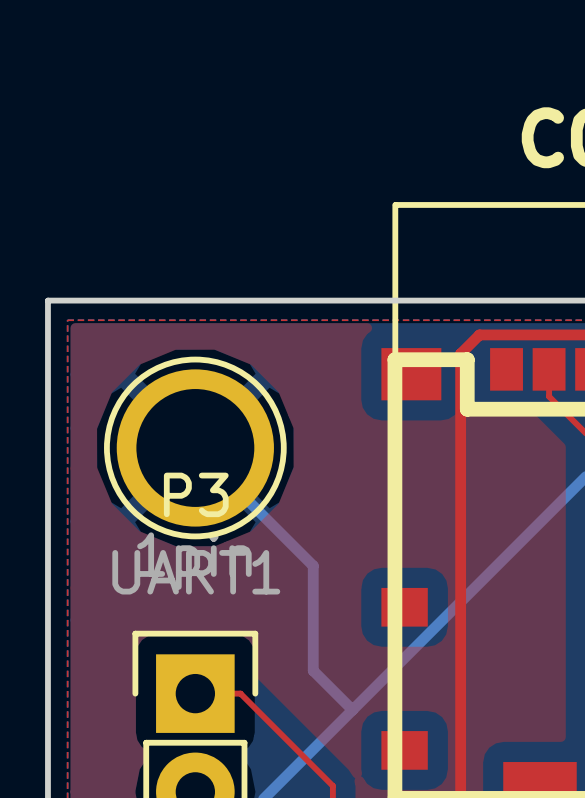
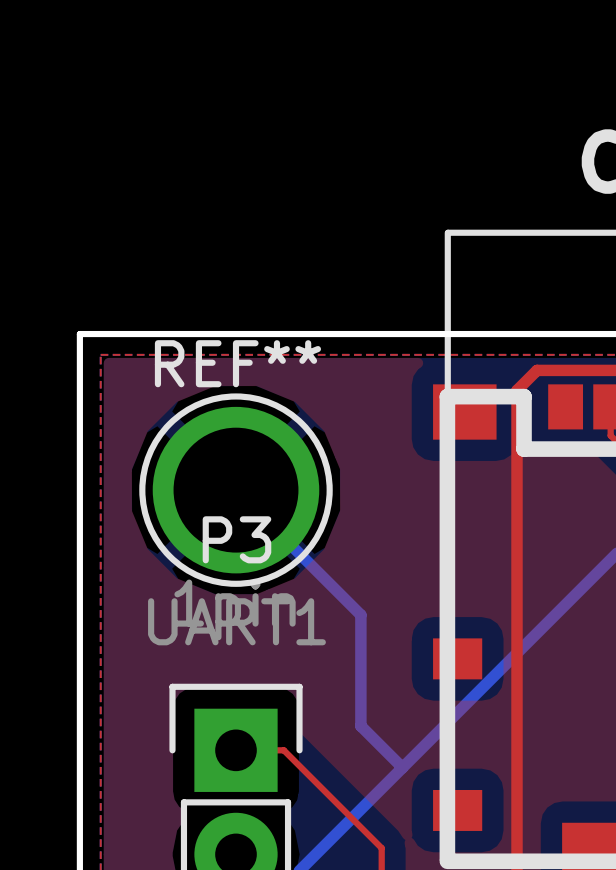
REF** name: none -> REF** (237, 363)

